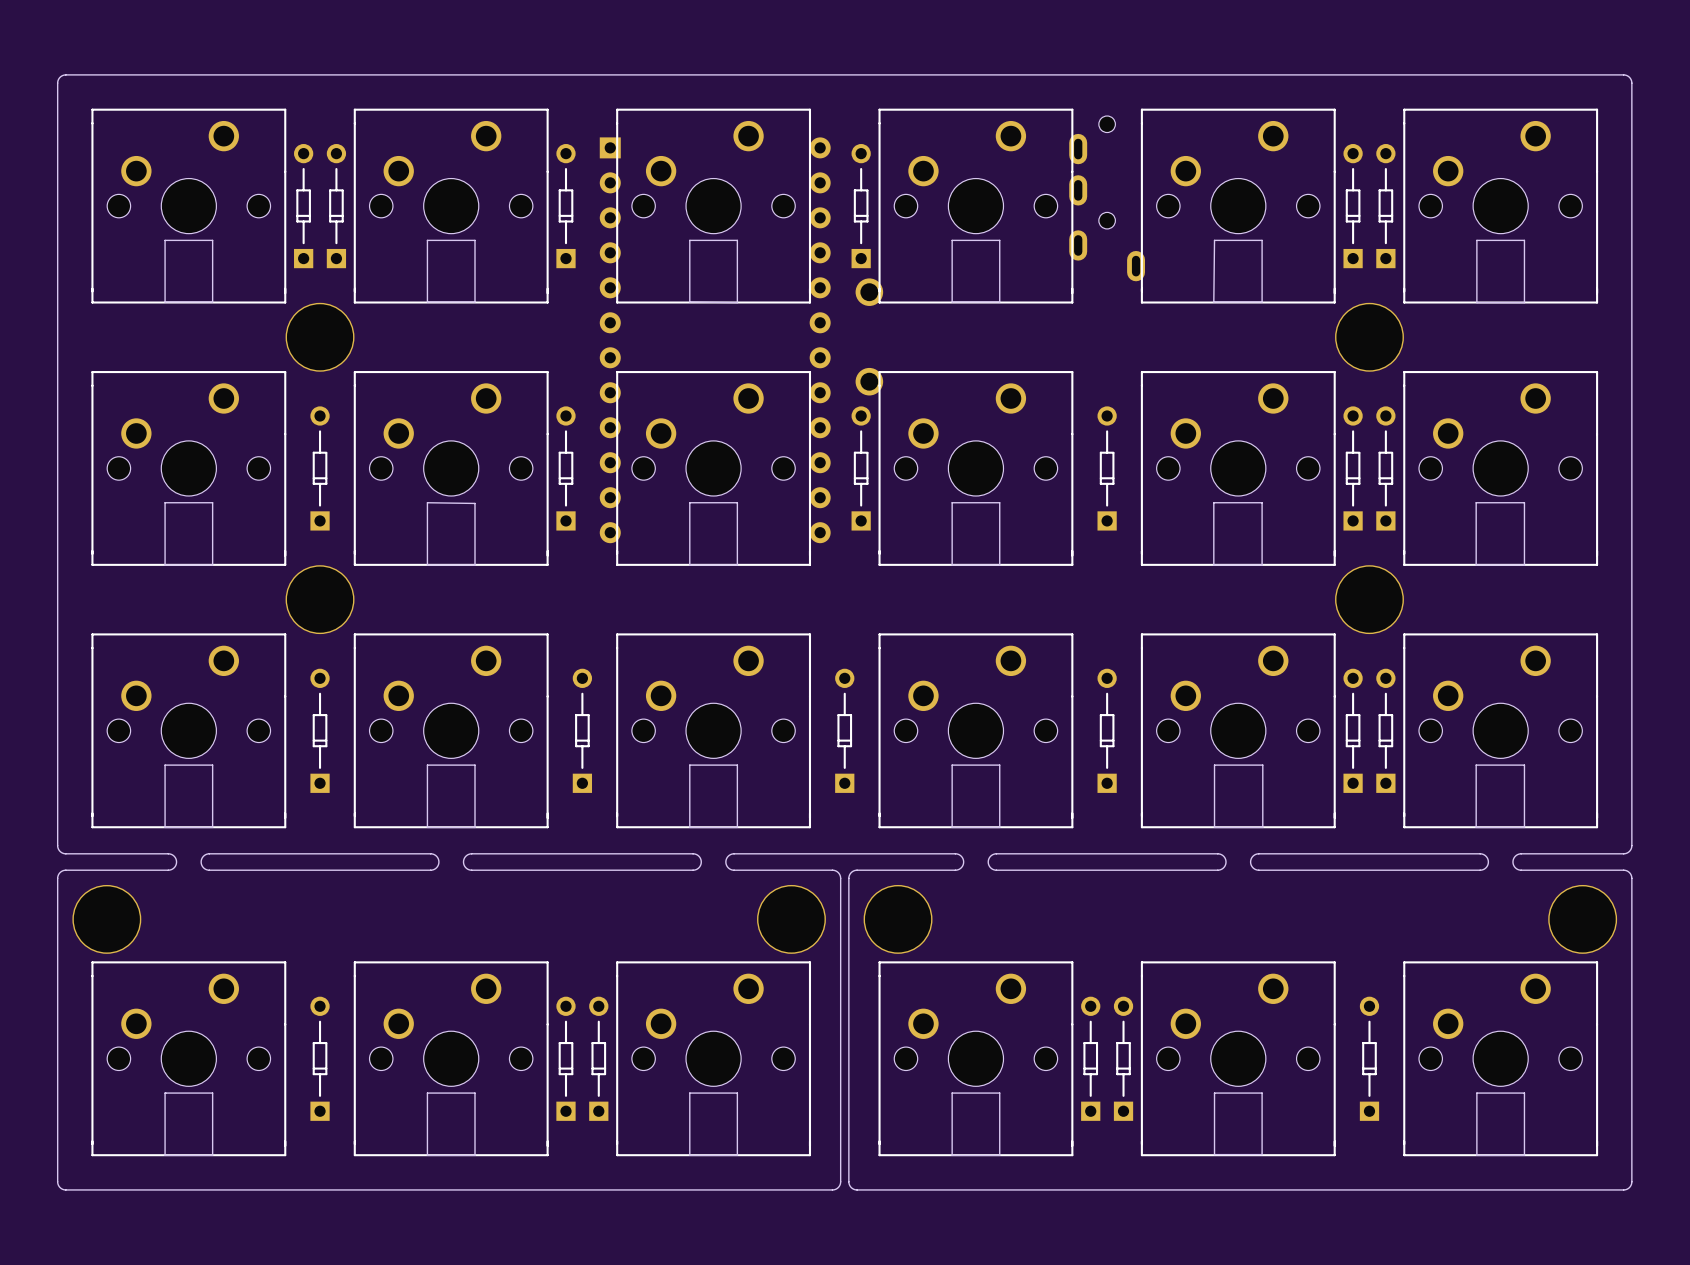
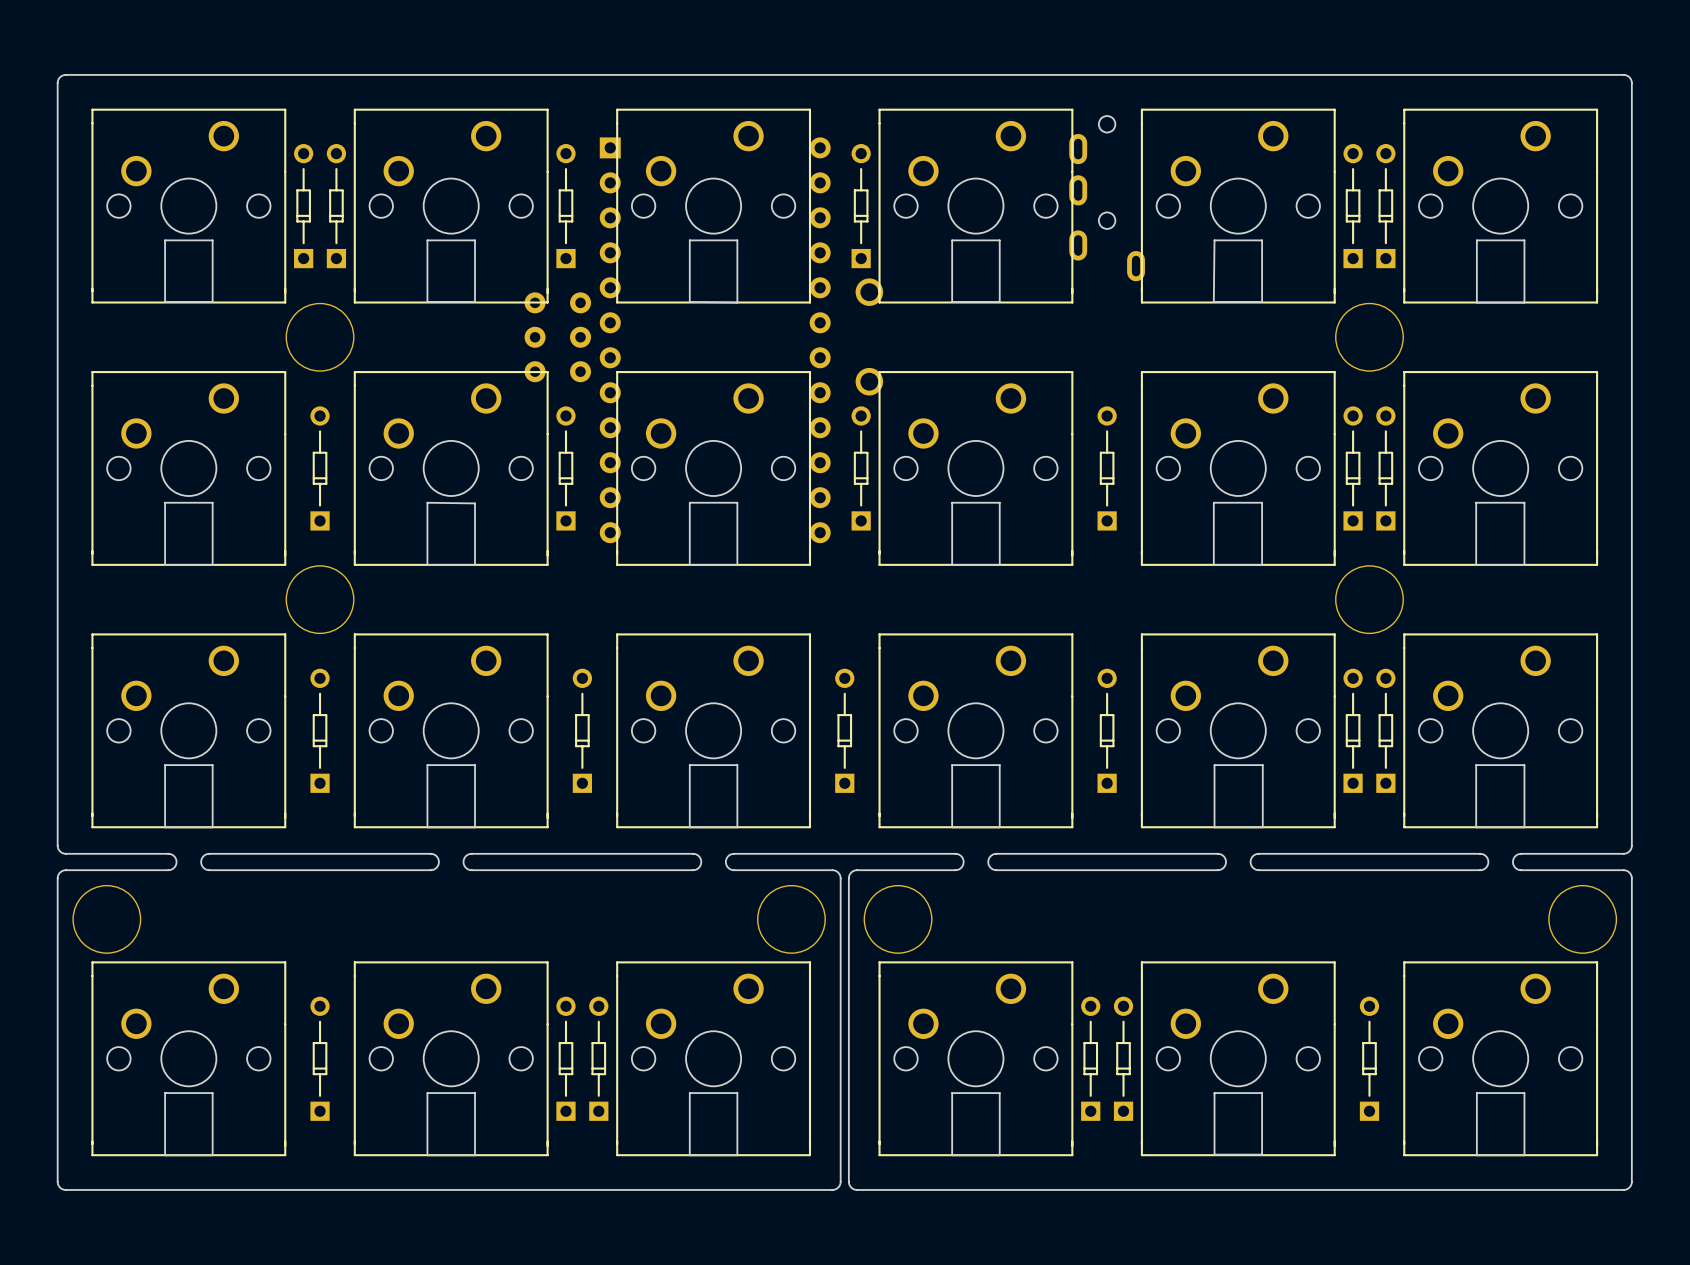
part: none -> (557, 337)

